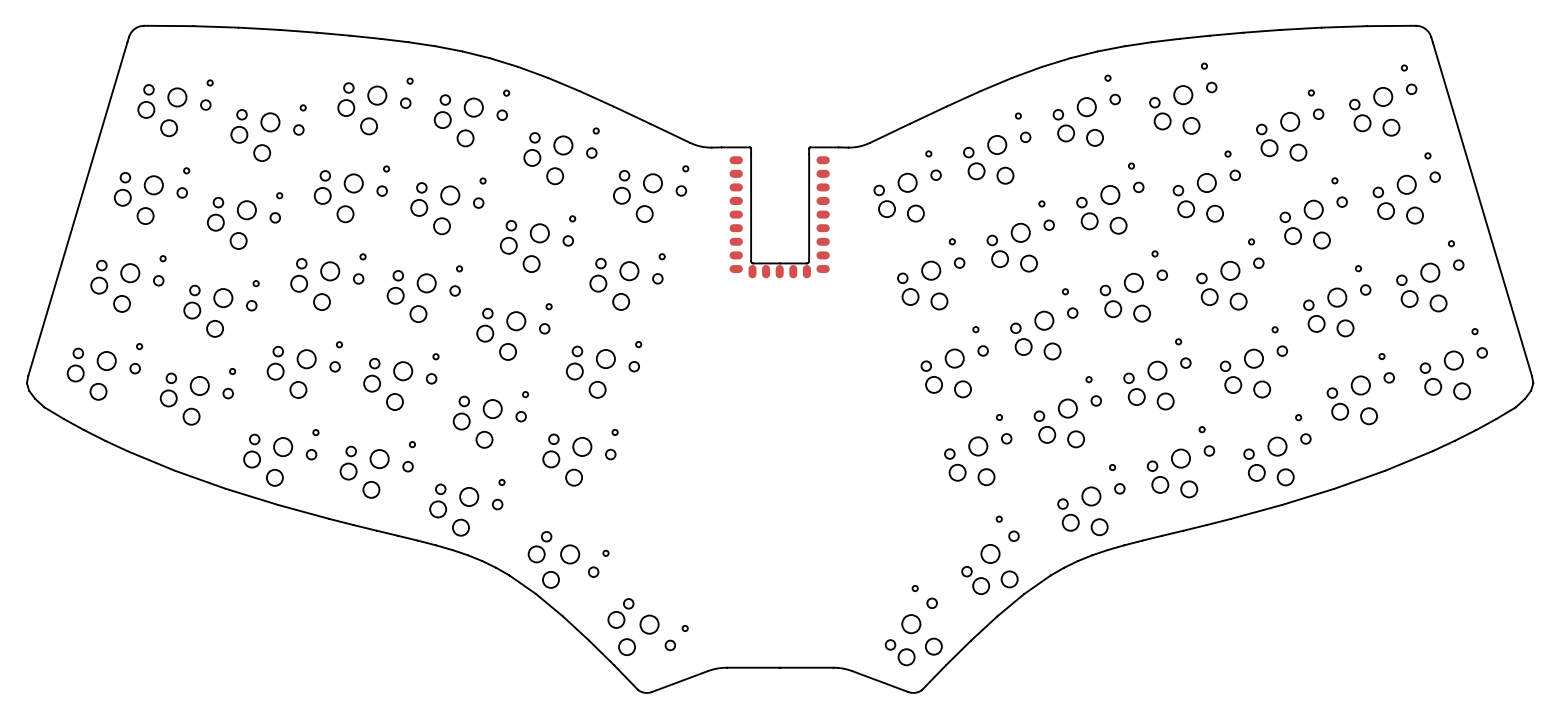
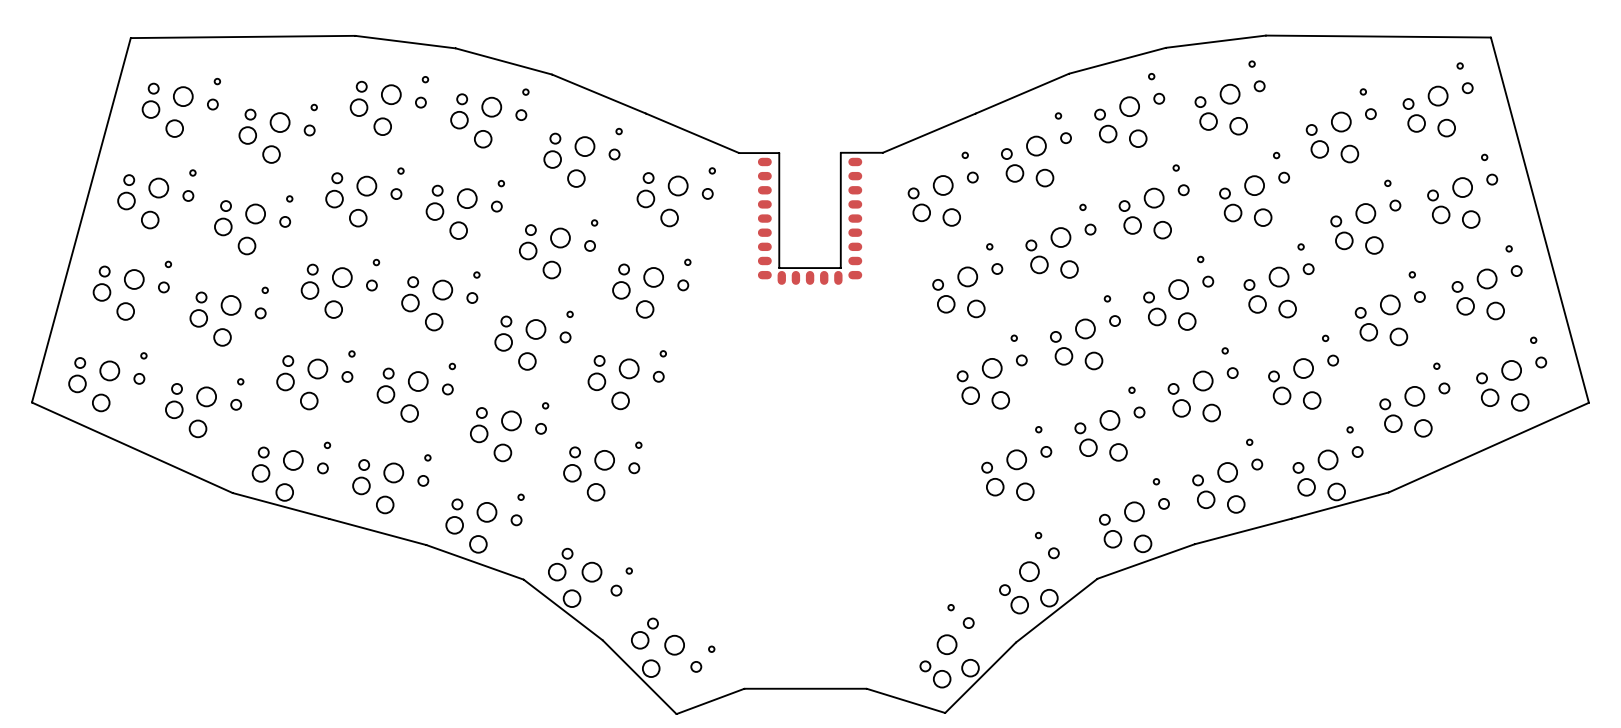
board edge: (144, 25) (238, 27) (316, 32) (408, 42) (462, 51) (518, 66) (547, 77) (697, 145) (708, 147) (750, 147) (751, 261) (753, 263) (808, 262) (809, 147) (852, 147) (863, 145) (1012, 77) (1042, 66) (1097, 51) (1151, 42) (1243, 32) (1321, 27) (1420, 26) (1427, 30) (1431, 37) (1533, 383) (1531, 390) (1524, 398) (1515, 407) (1496, 418) (1454, 440) (1384, 470) (1282, 504) (1107, 550) (1064, 567) (1024, 594) (997, 616) (918, 691) (910, 692) (839, 668) (726, 667) (711, 670) (651, 692) (643, 692) (638, 690) (562, 616) (536, 594) (496, 567) (452, 550) (278, 504) (175, 470) (127, 451) (84, 430) (44, 407) (29, 390) (26, 383) (28, 376) (128, 37) (134, 28) (144, 25) -> (1265, 35) (1166, 47) (1069, 73) (882, 152) (840, 152) (840, 268) (779, 268) (779, 153) (739, 153) (552, 74) (455, 48) (355, 35) (130, 38) (31, 402) (232, 493) (426, 545) (523, 579) (602, 640) (676, 714) (744, 688) (866, 688) (945, 712) (1015, 642) (1097, 578) (1194, 544) (1388, 492) (1588, 402) (1490, 37) (1265, 35)

